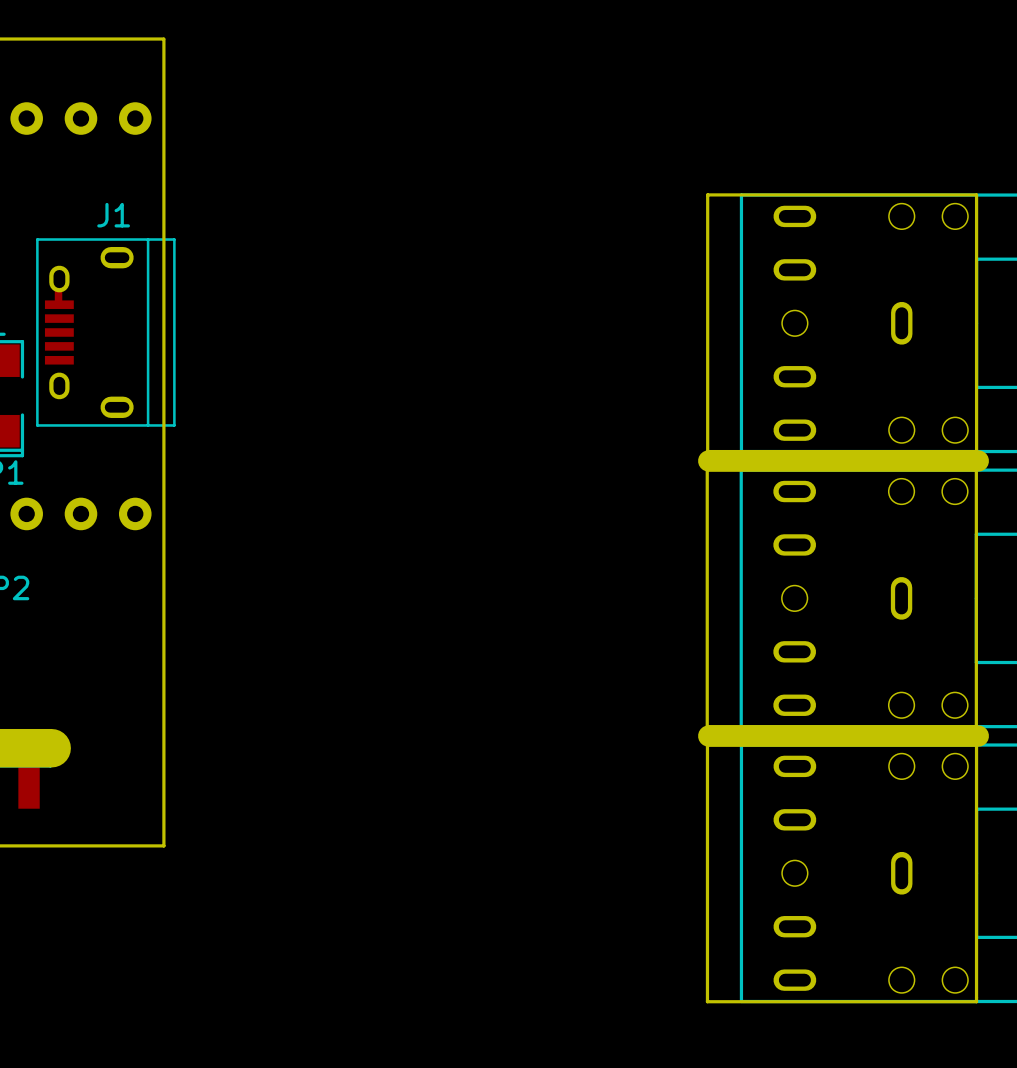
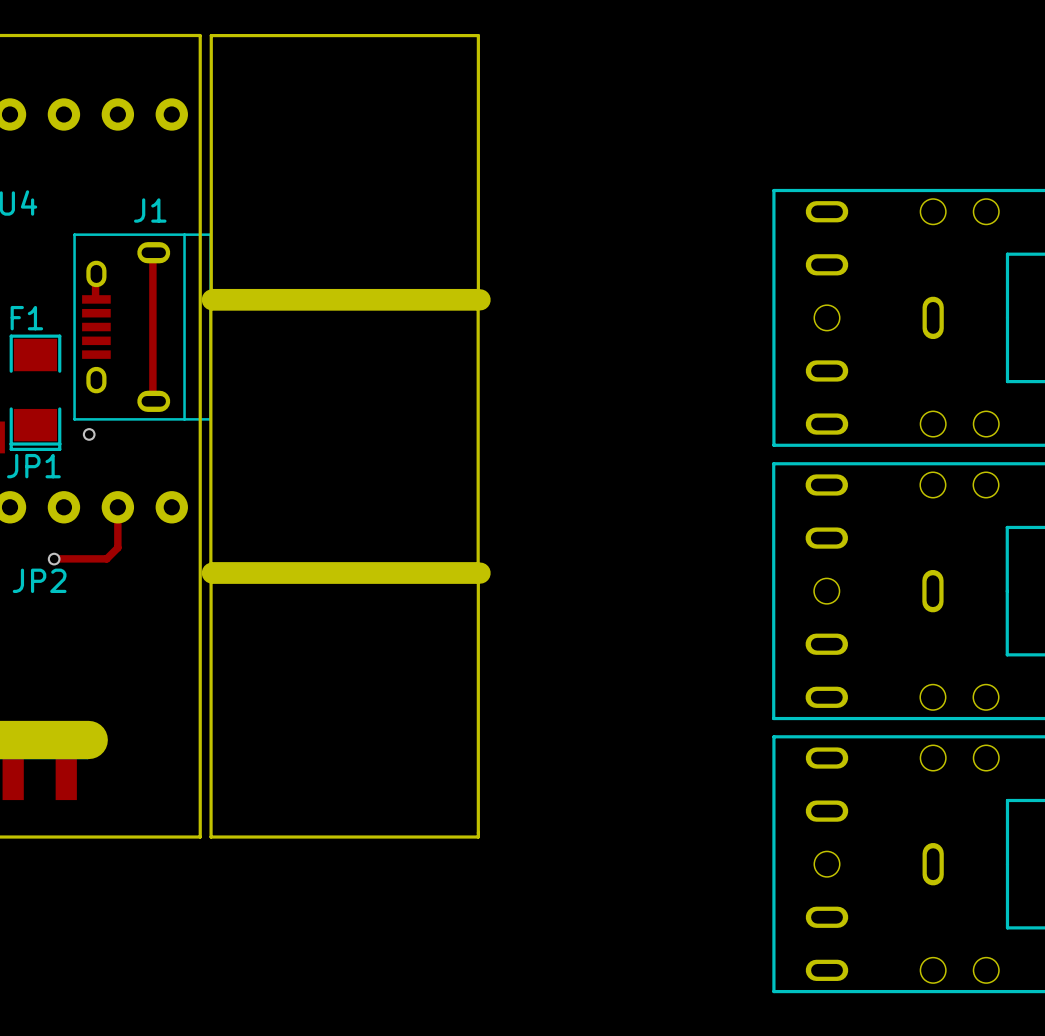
board edge: none -> (478, 35) (211, 35) (211, 290) (478, 290) (478, 35)
board edge: (976, 194) (707, 194) (707, 451) (976, 451) (976, 195) -> none
track: none -> (152, 252) (152, 400)
board edge: none -> (212, 299) (480, 299)
board edge: none -> (210, 308) (210, 563) (478, 563) (478, 308) (210, 308)
via: none -> (89, 434)
board edge: (708, 460) (978, 460) -> none
board edge: (707, 469) (707, 726) (976, 726) (976, 469) (707, 469) -> none
track: none -> (117, 507) (117, 547) (106, 558) (54, 558)
via: none -> (54, 559)
board edge: none -> (212, 573) (480, 573)
board edge: none -> (211, 582) (211, 837) (478, 837) (478, 582) (211, 582)
board edge: (708, 736) (978, 736) -> none
board edge: (707, 745) (707, 1001) (976, 1001) (976, 745) (707, 745) -> none

